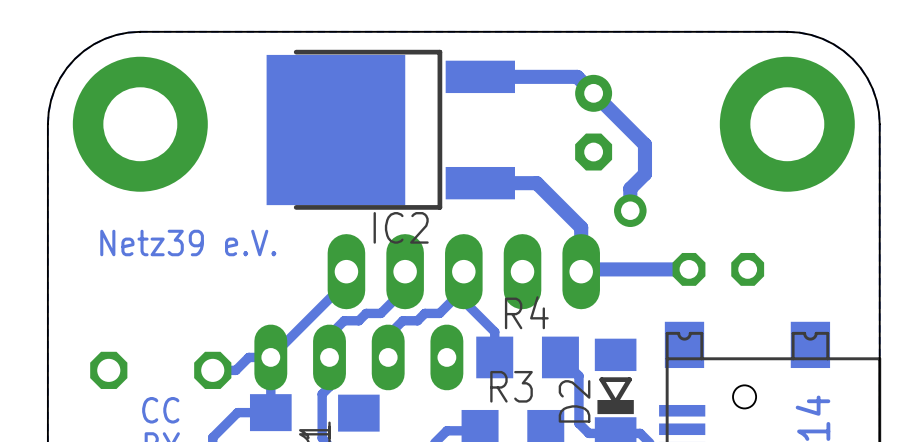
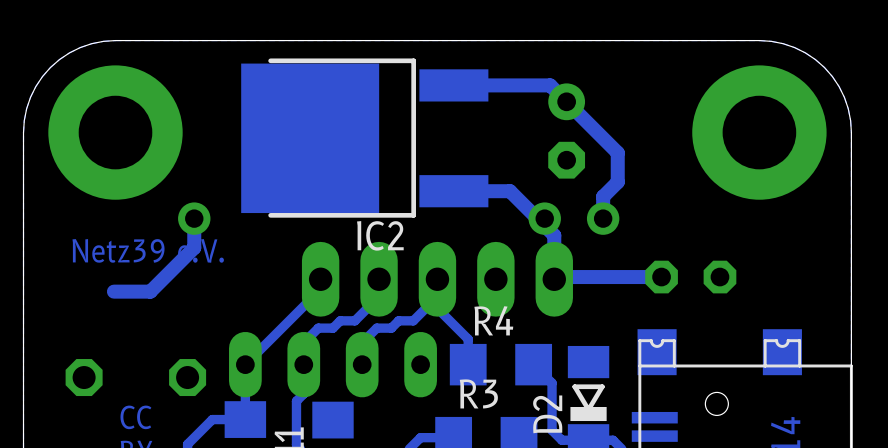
track: none -> (194, 218) (194, 247) (150, 291) (113, 291)
via: none -> (194, 218)
via: none -> (544, 218)
track: (270, 357) (248, 357) (235, 370) (212, 370) -> none

